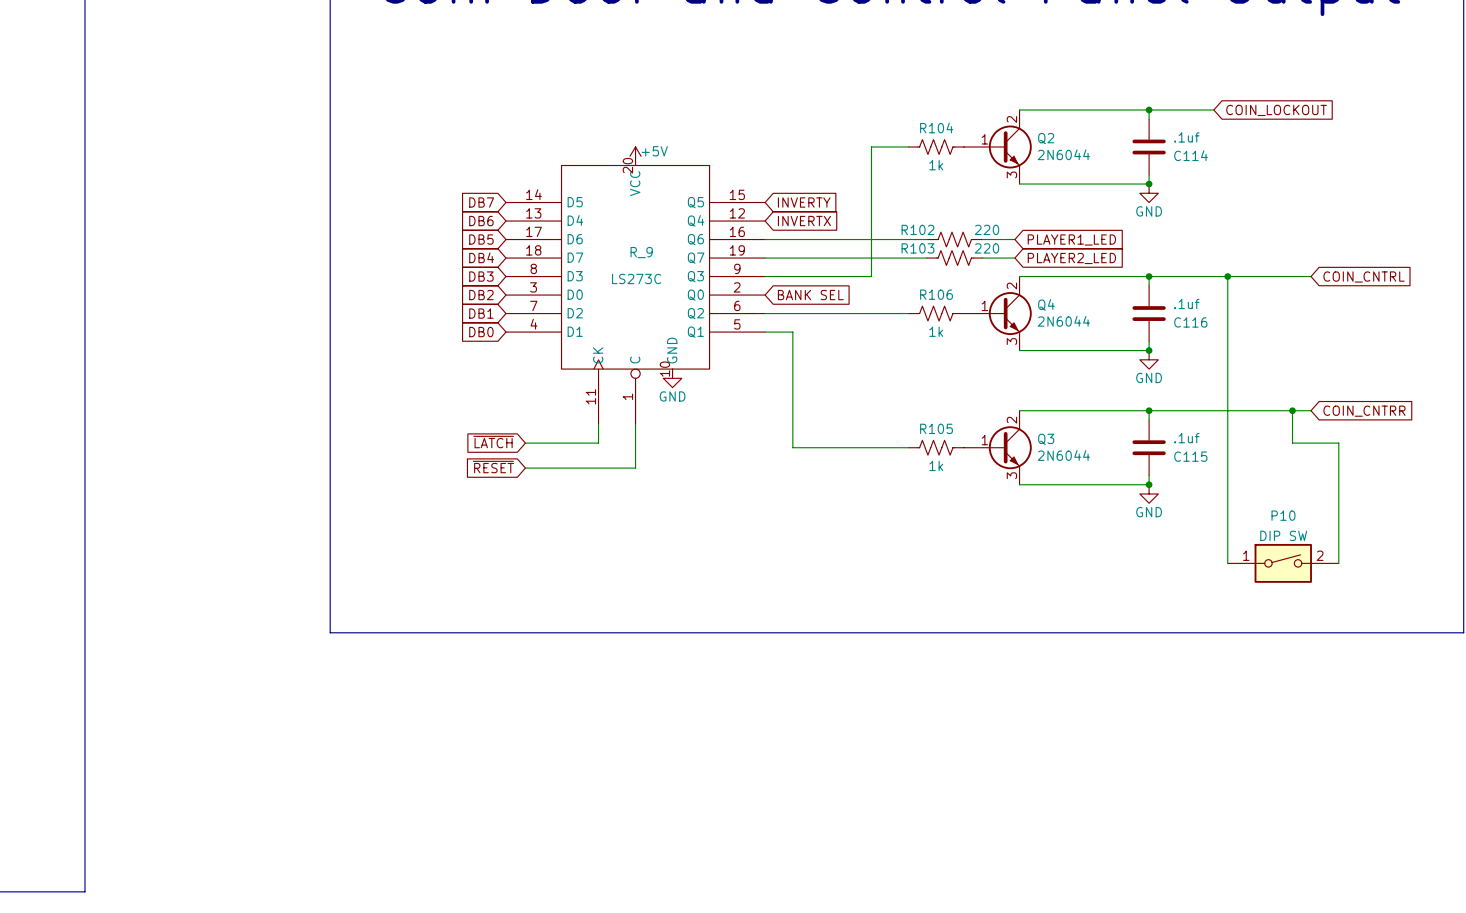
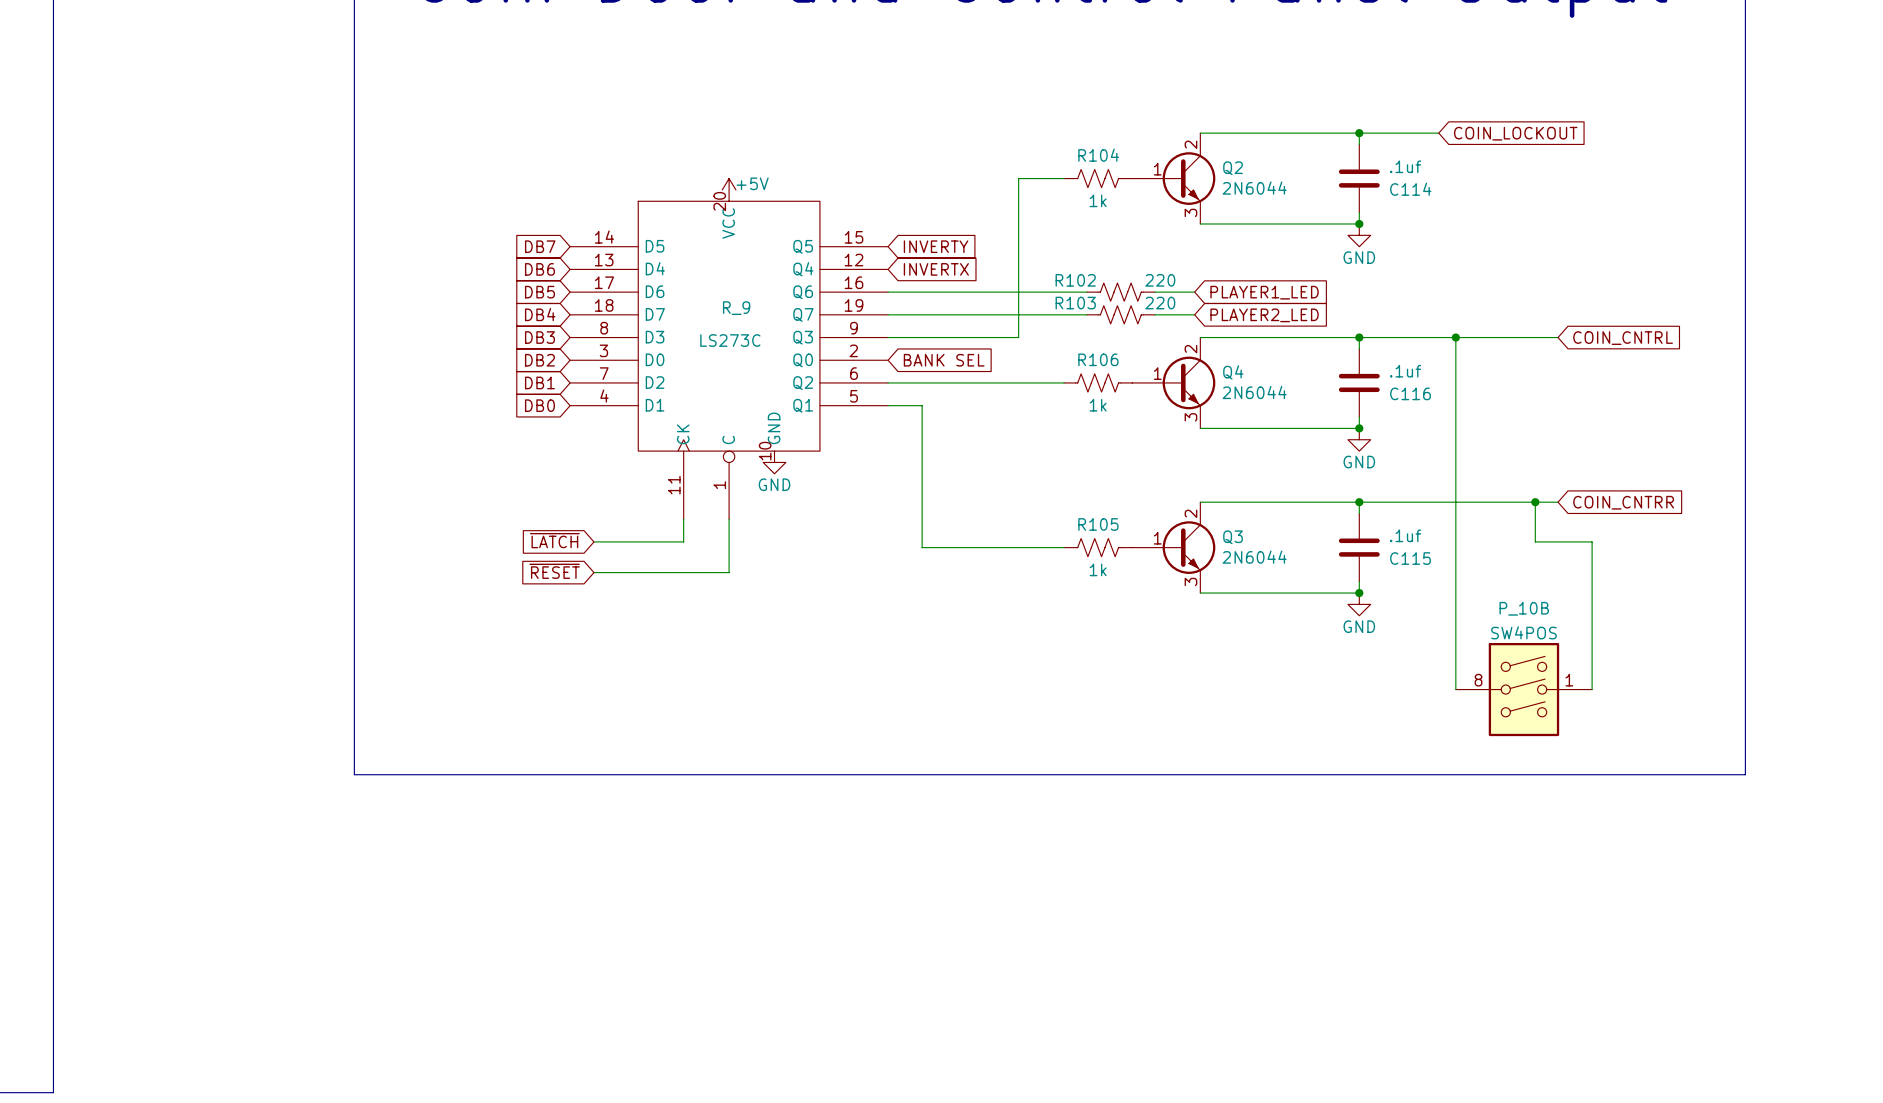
P10: DIP SW (1283, 563) -> none
P_10B: none -> SW4POS (1523, 689)

